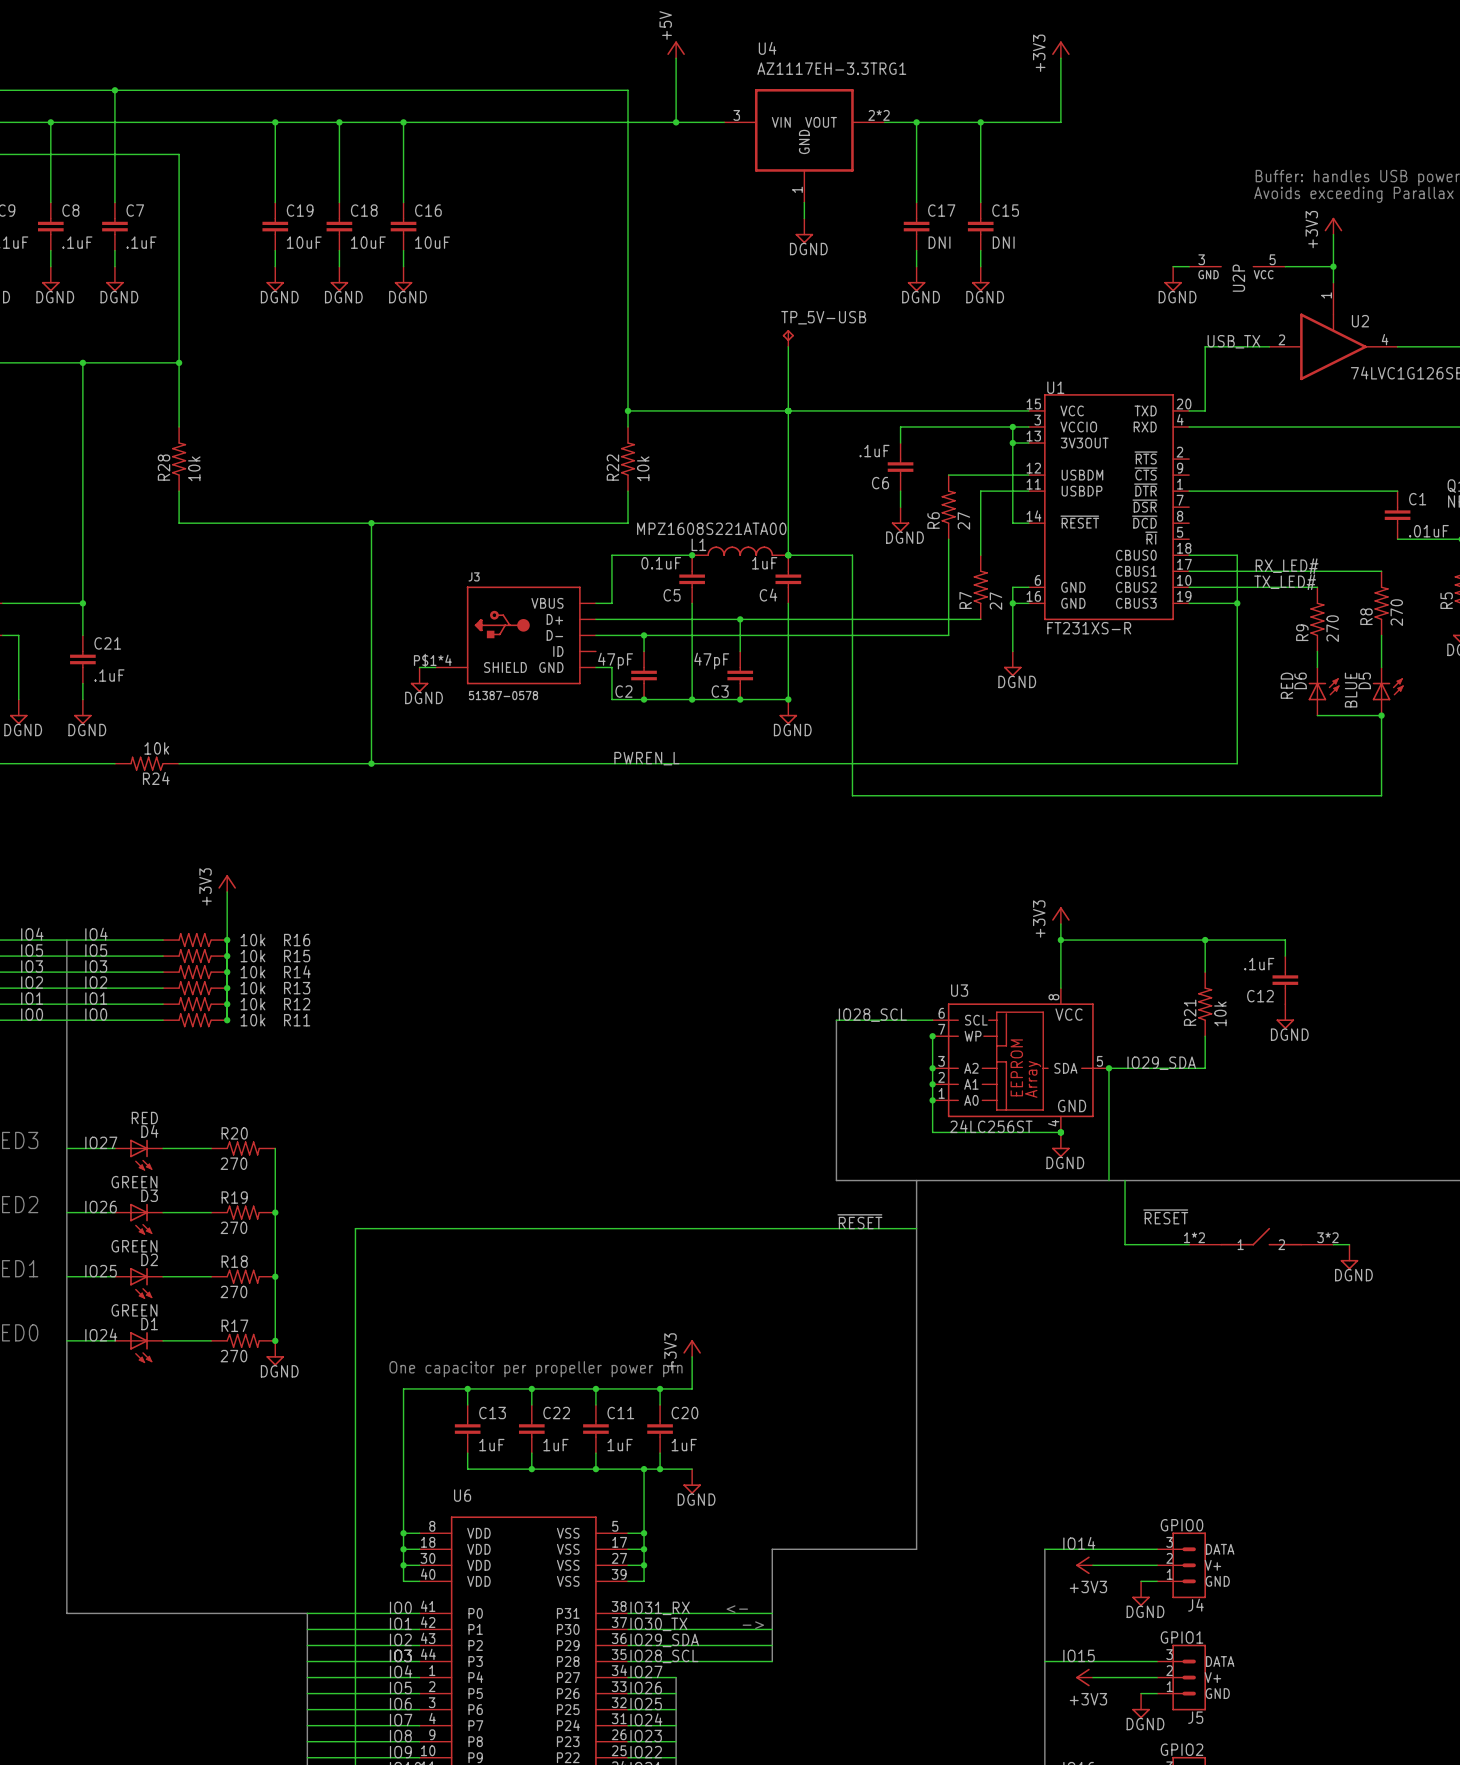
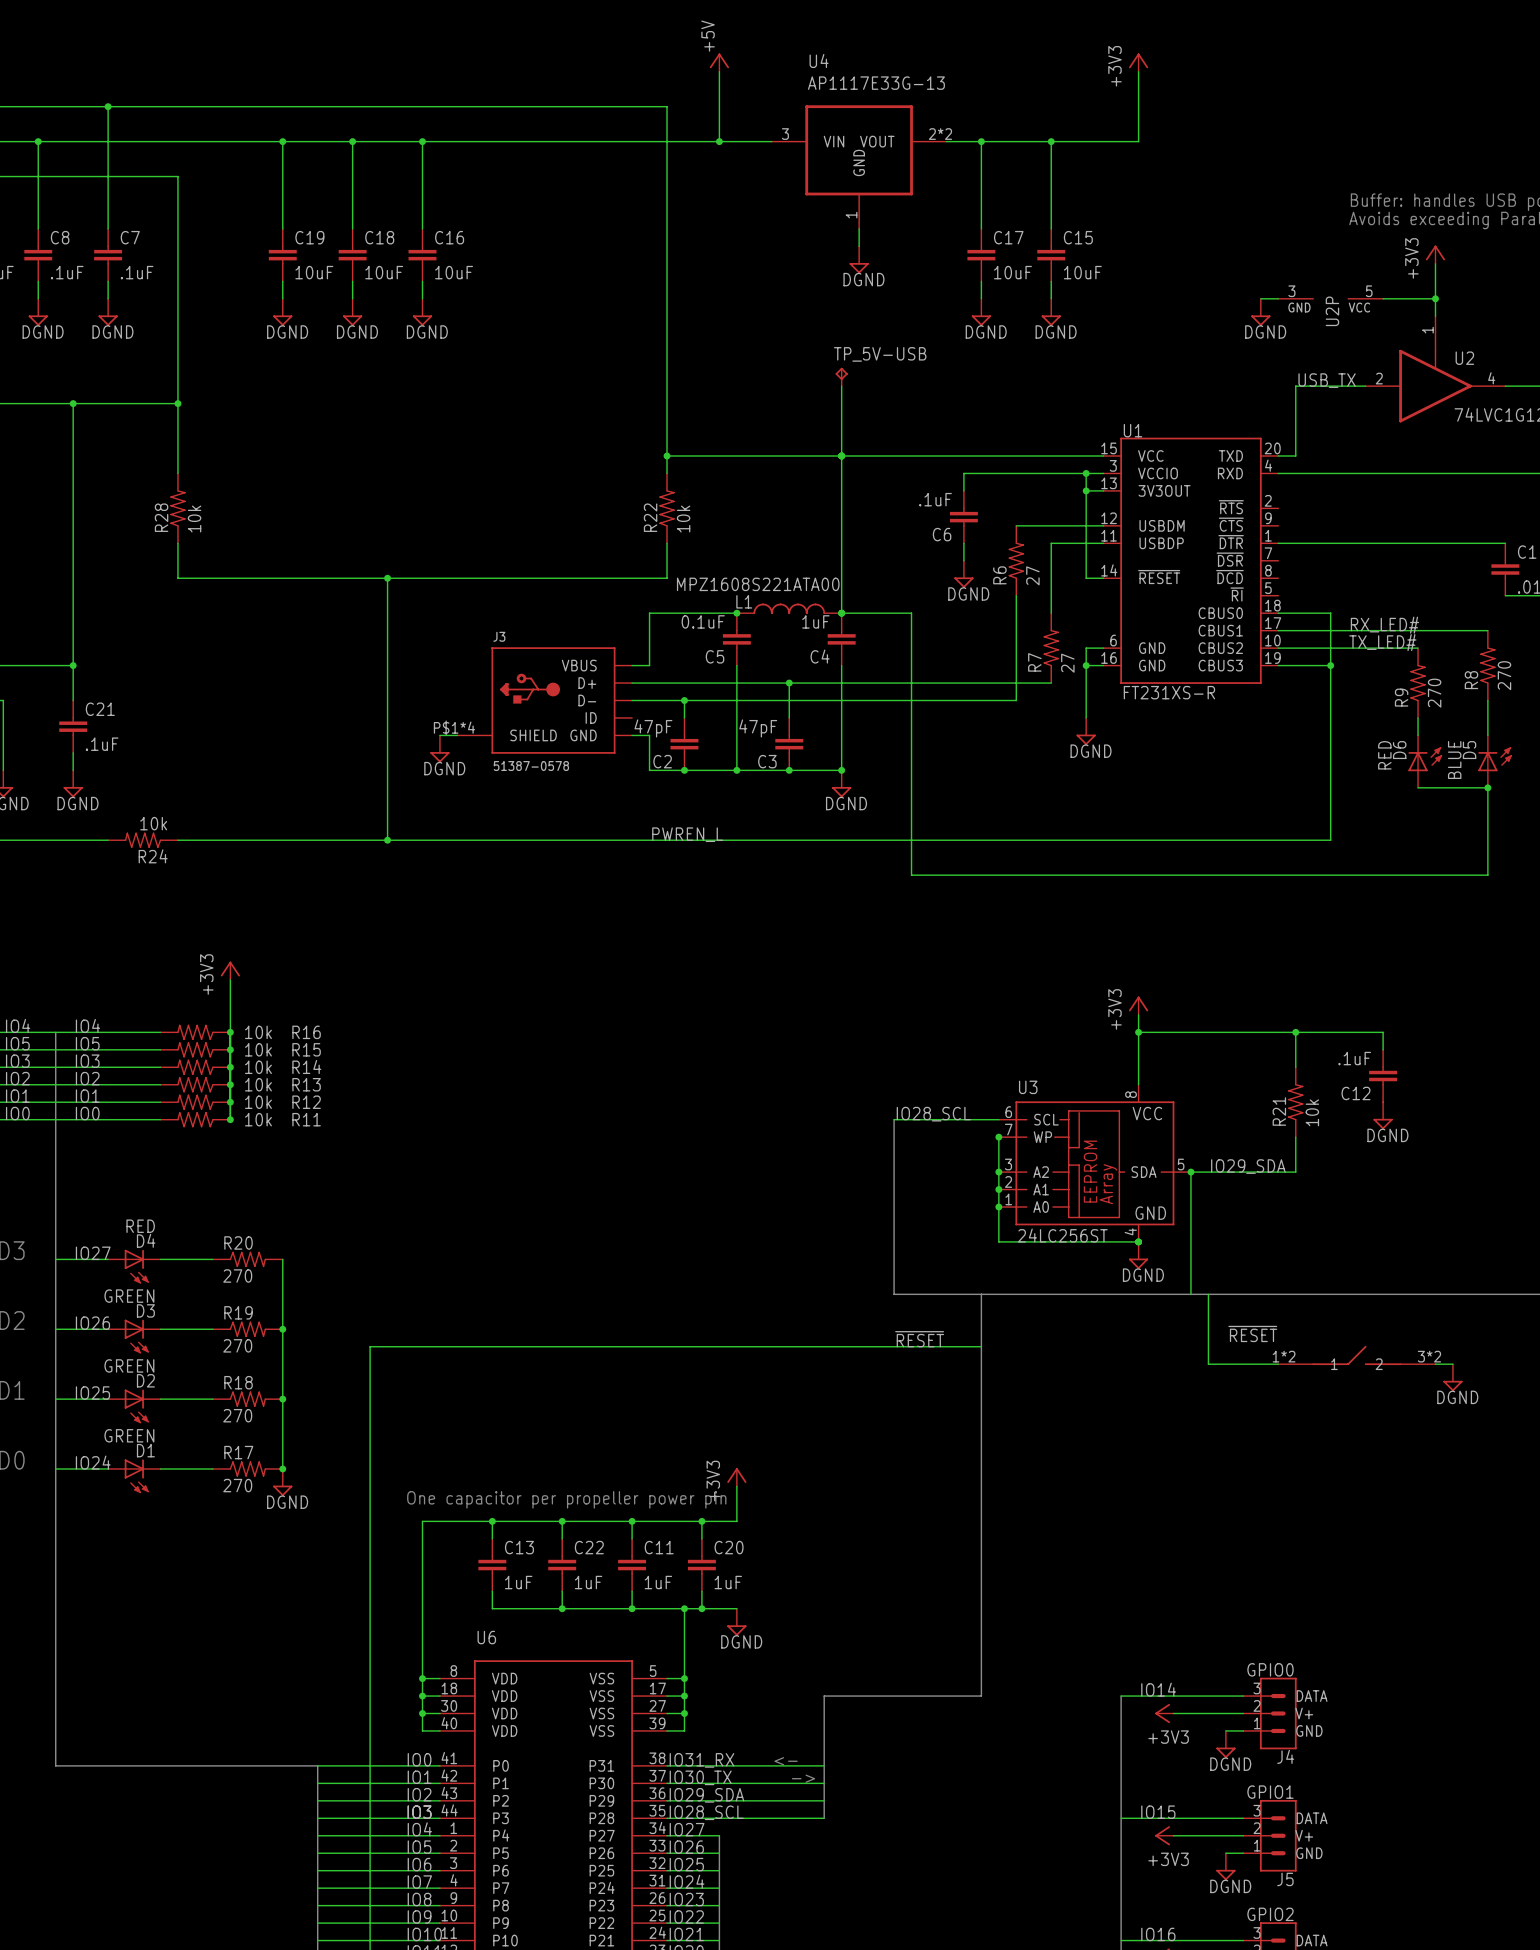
U4 value: AZ1117EH-3.3TRG1 (831, 68) -> AP1117E33G-13 (876, 83)
C17 value: DNI (939, 242) -> 10uF (1012, 272)
C15 value: DNI (1003, 242) -> 10uF (1082, 272)

